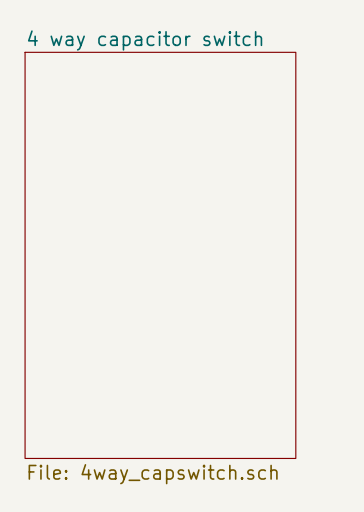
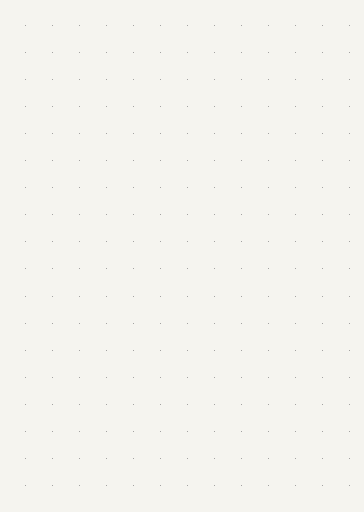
sheet 4 way capacitor switch: File: 4way_capswitch.sch (160, 255) -> none

